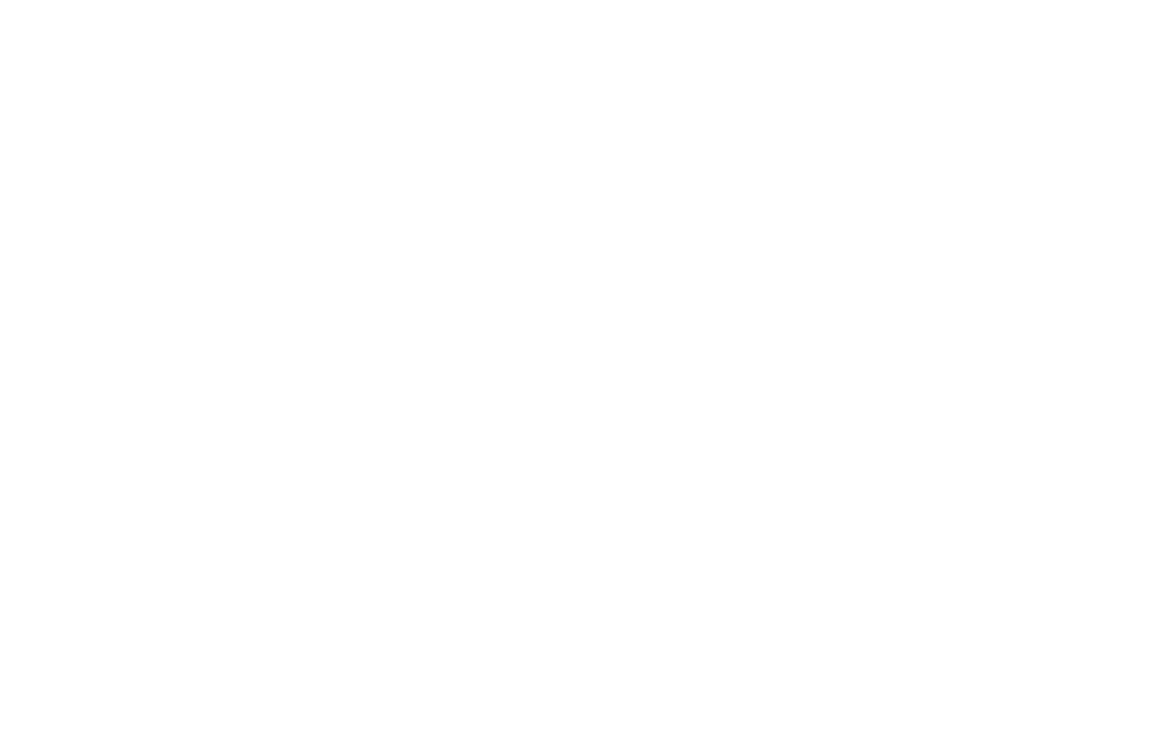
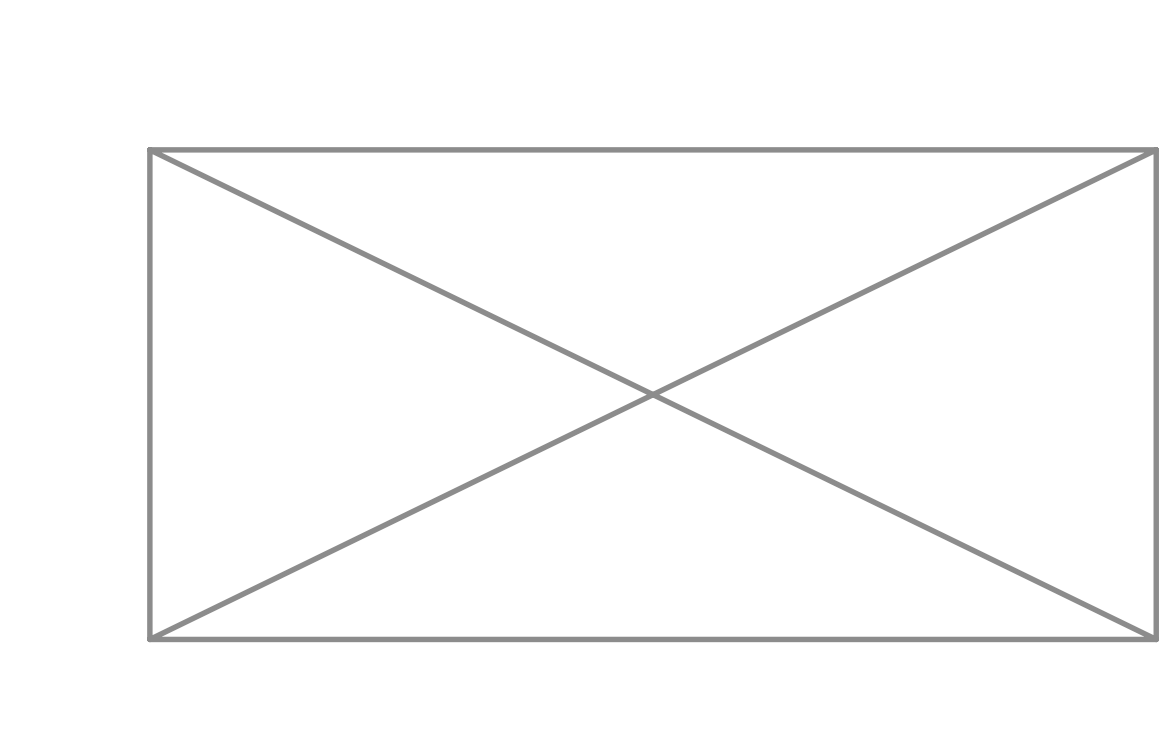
drawing: none -> [147, 147, 1159, 643]

